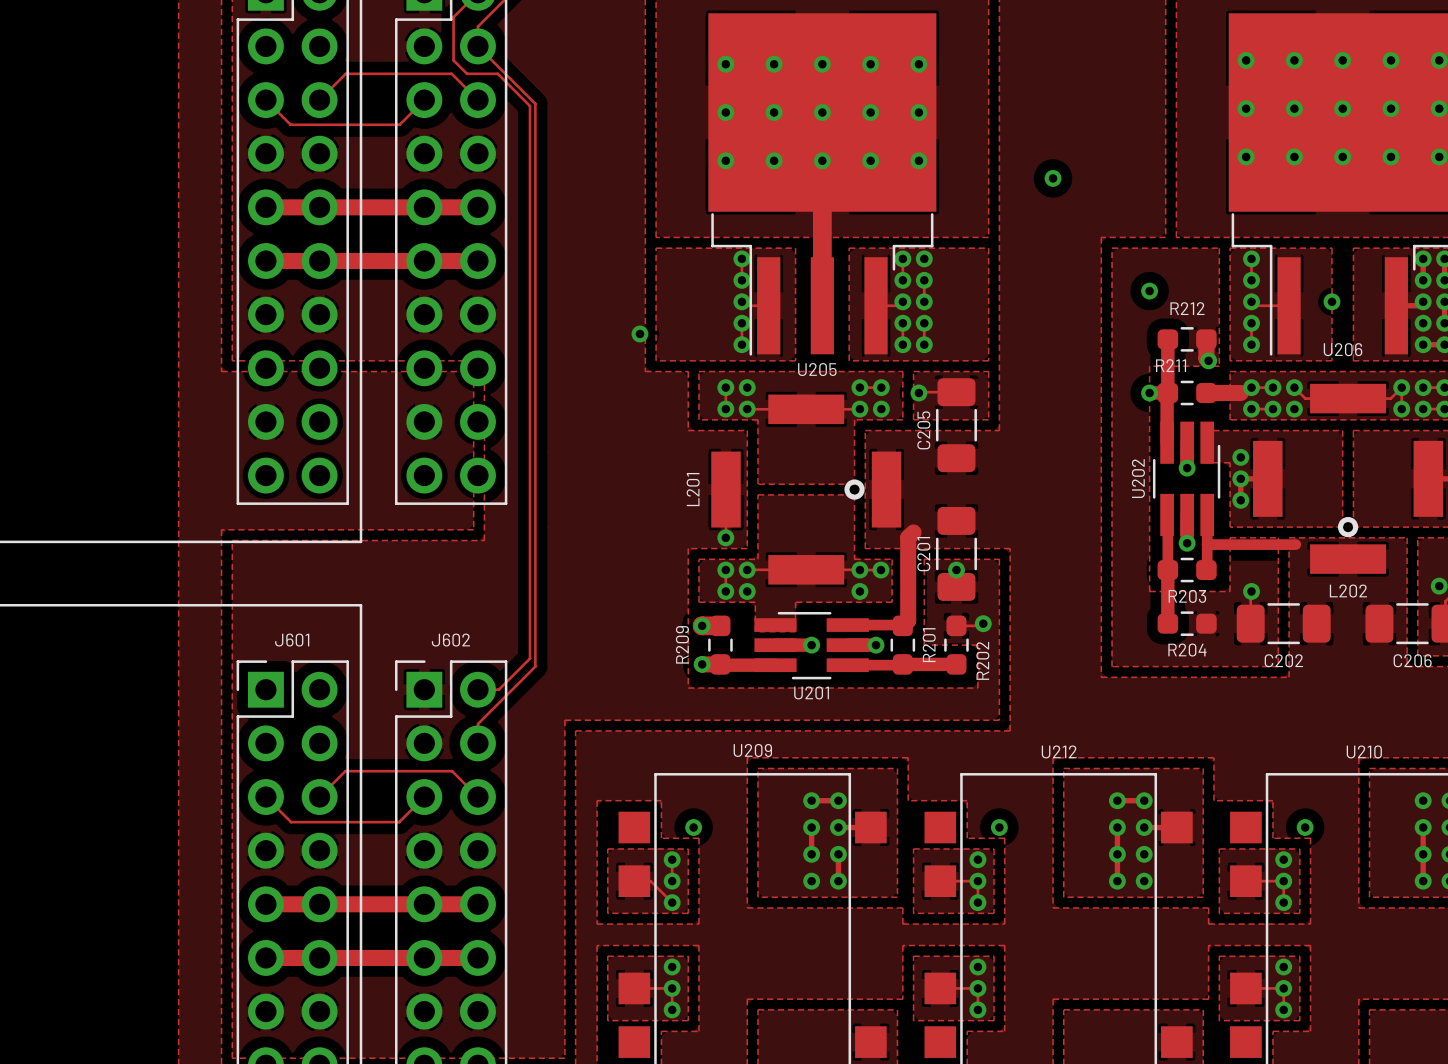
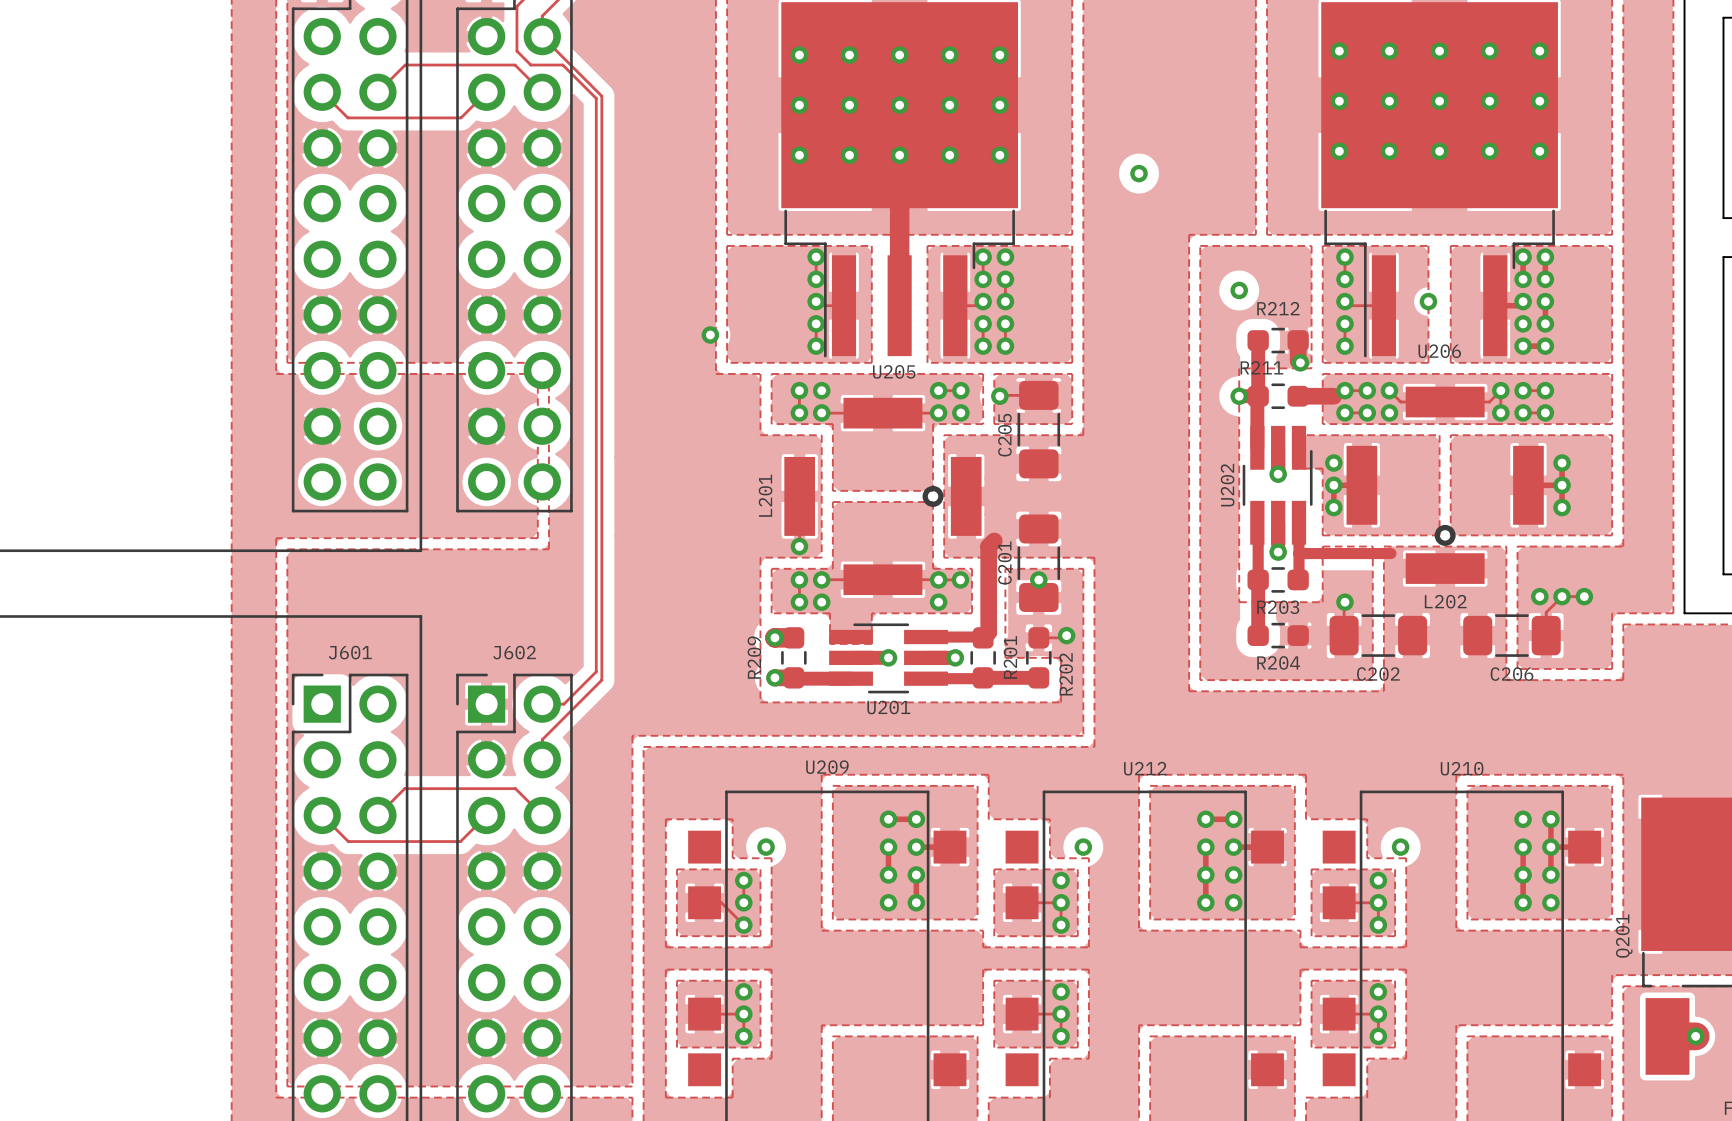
track: (265, 207) (477, 207) -> none
track: (265, 261) (477, 261) -> none
track: (265, 904) (477, 904) -> none
track: (265, 957) (477, 957) -> none

